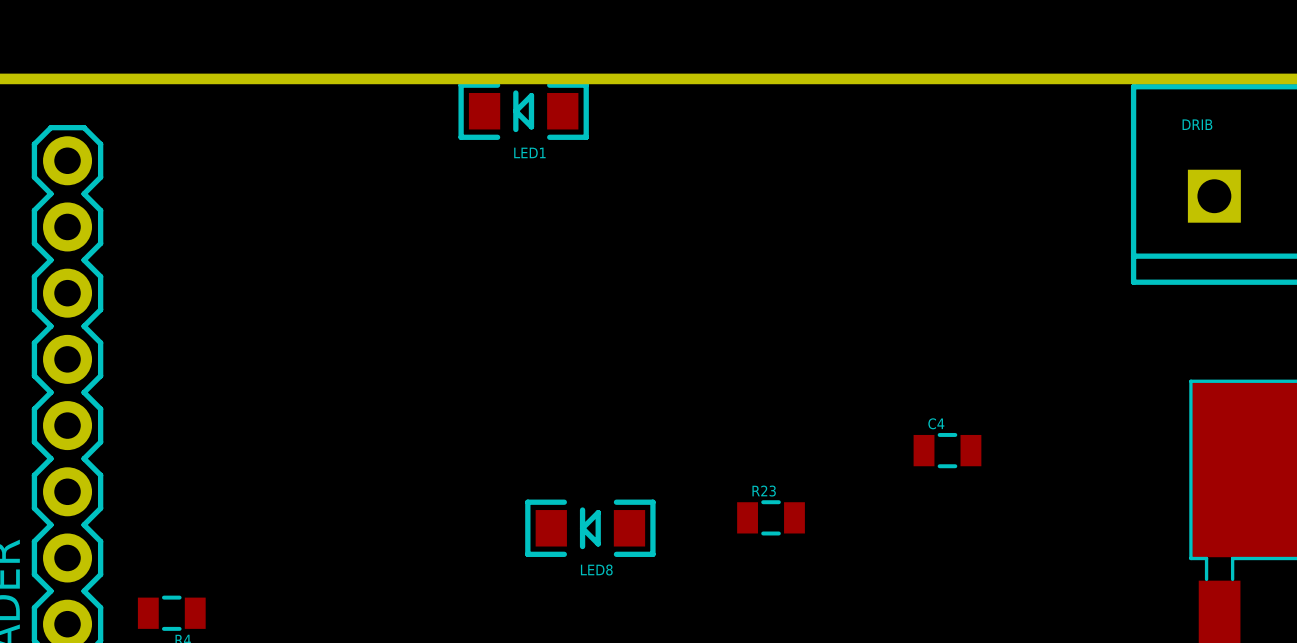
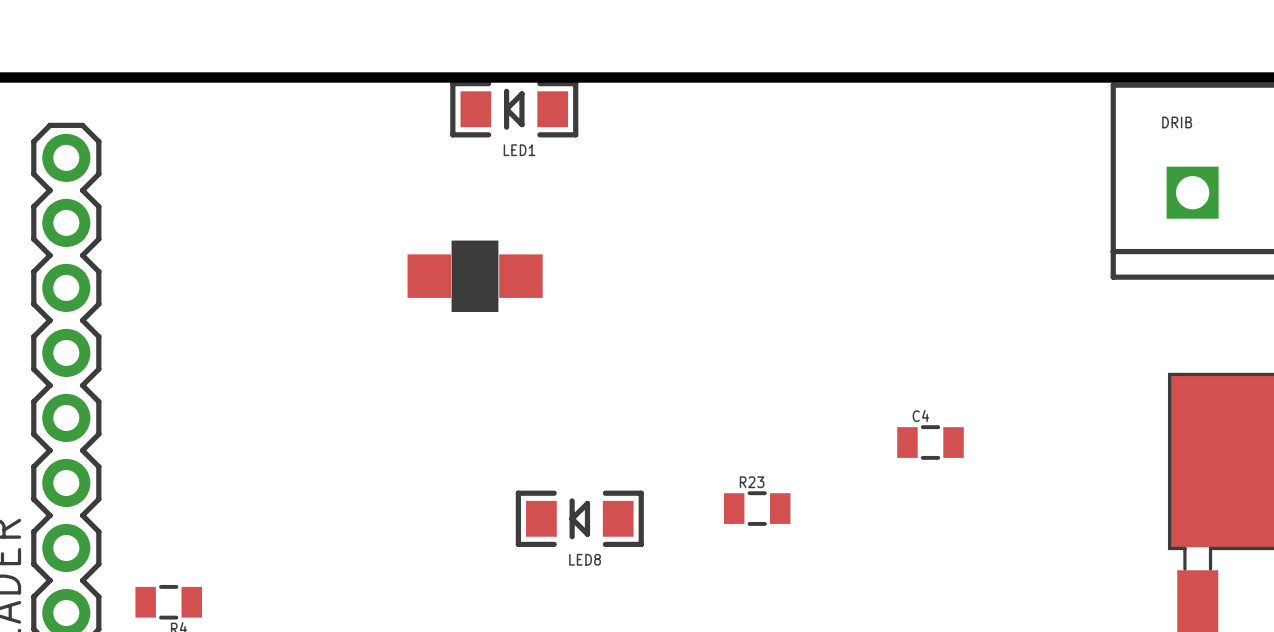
part: none -> (475, 276)

